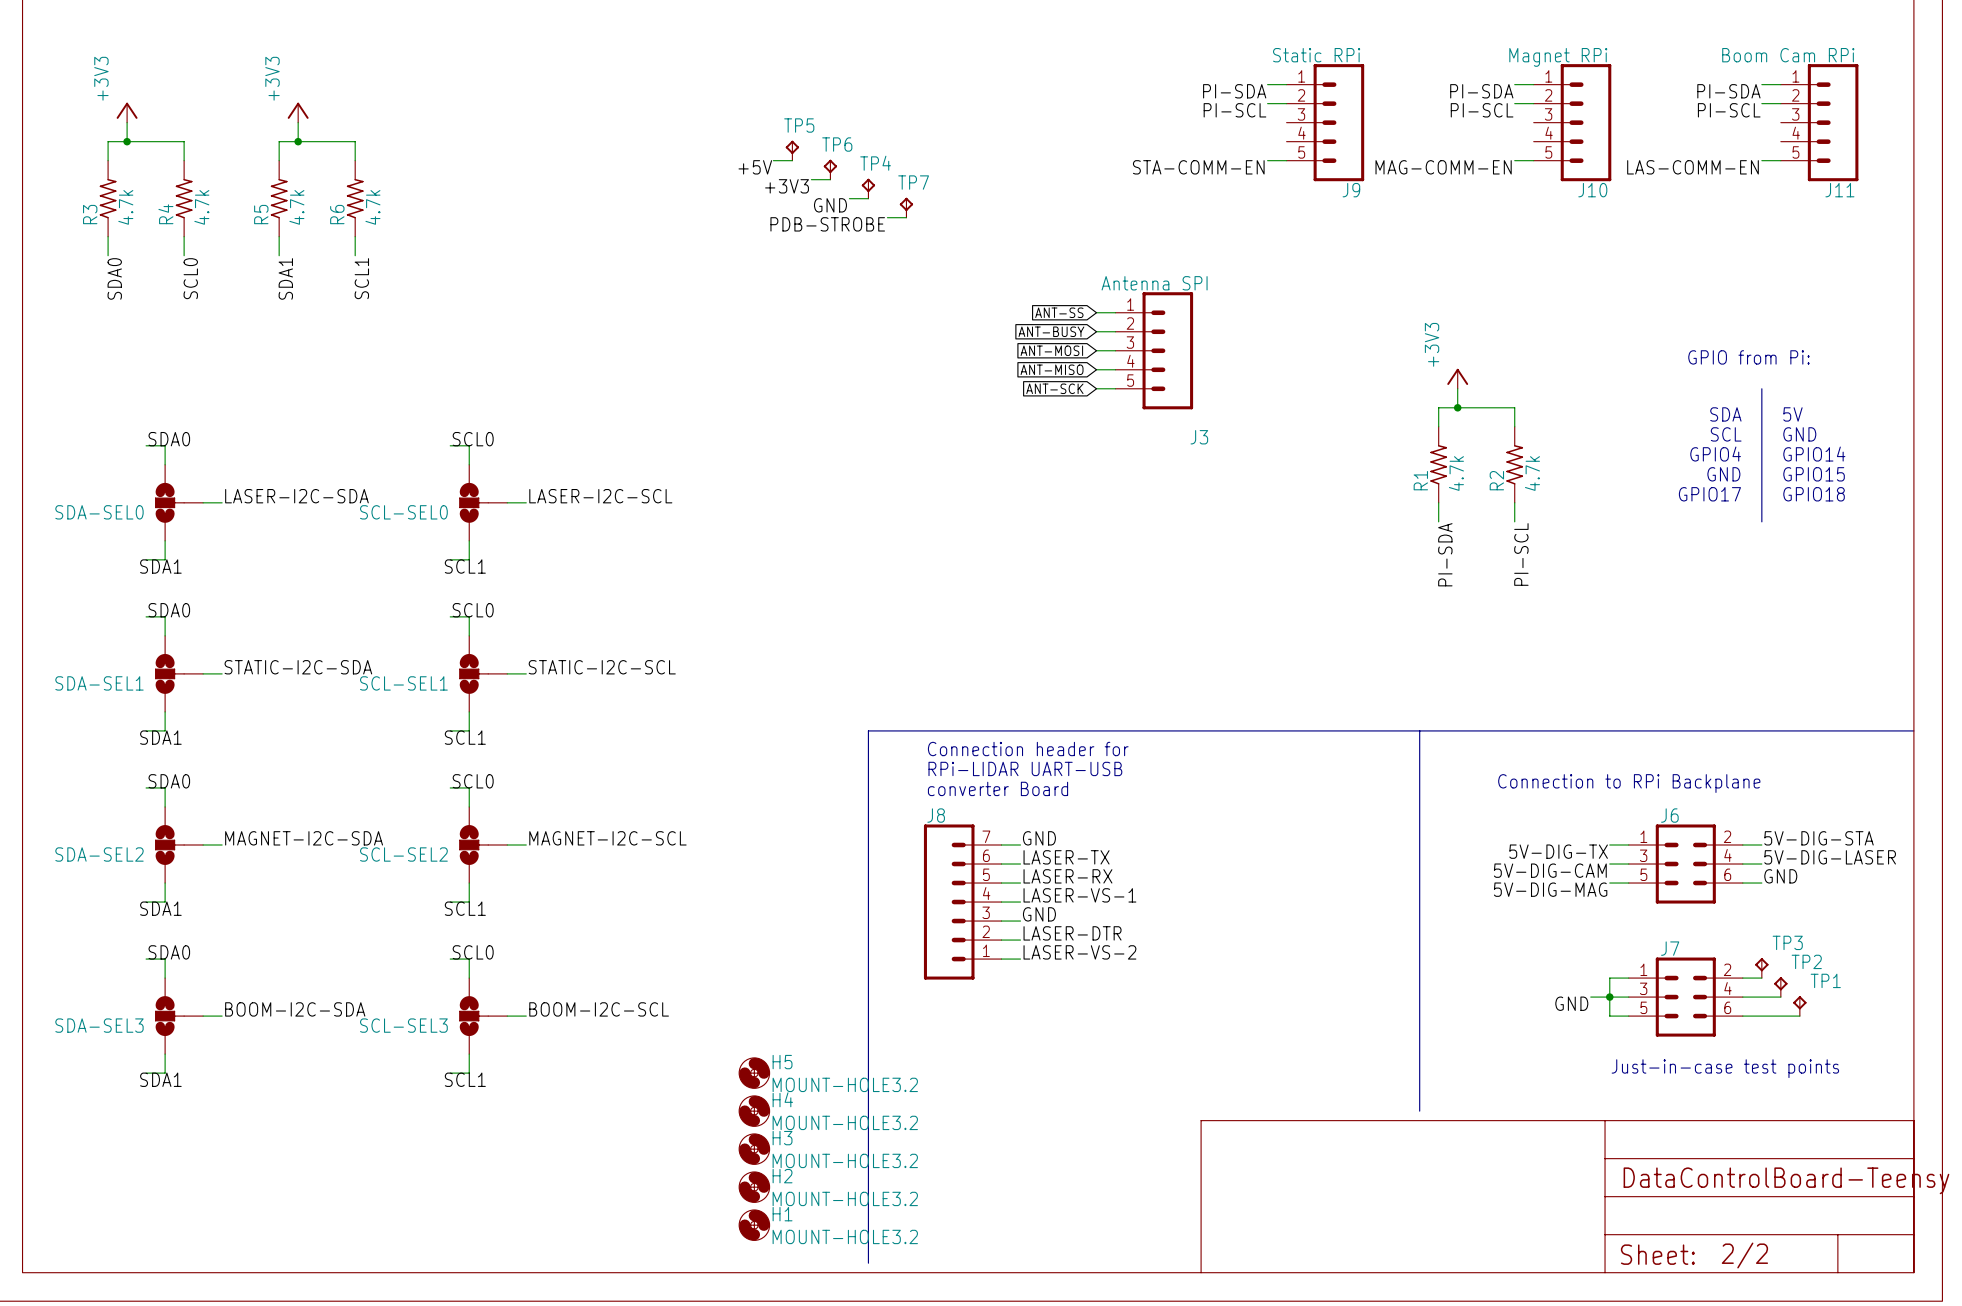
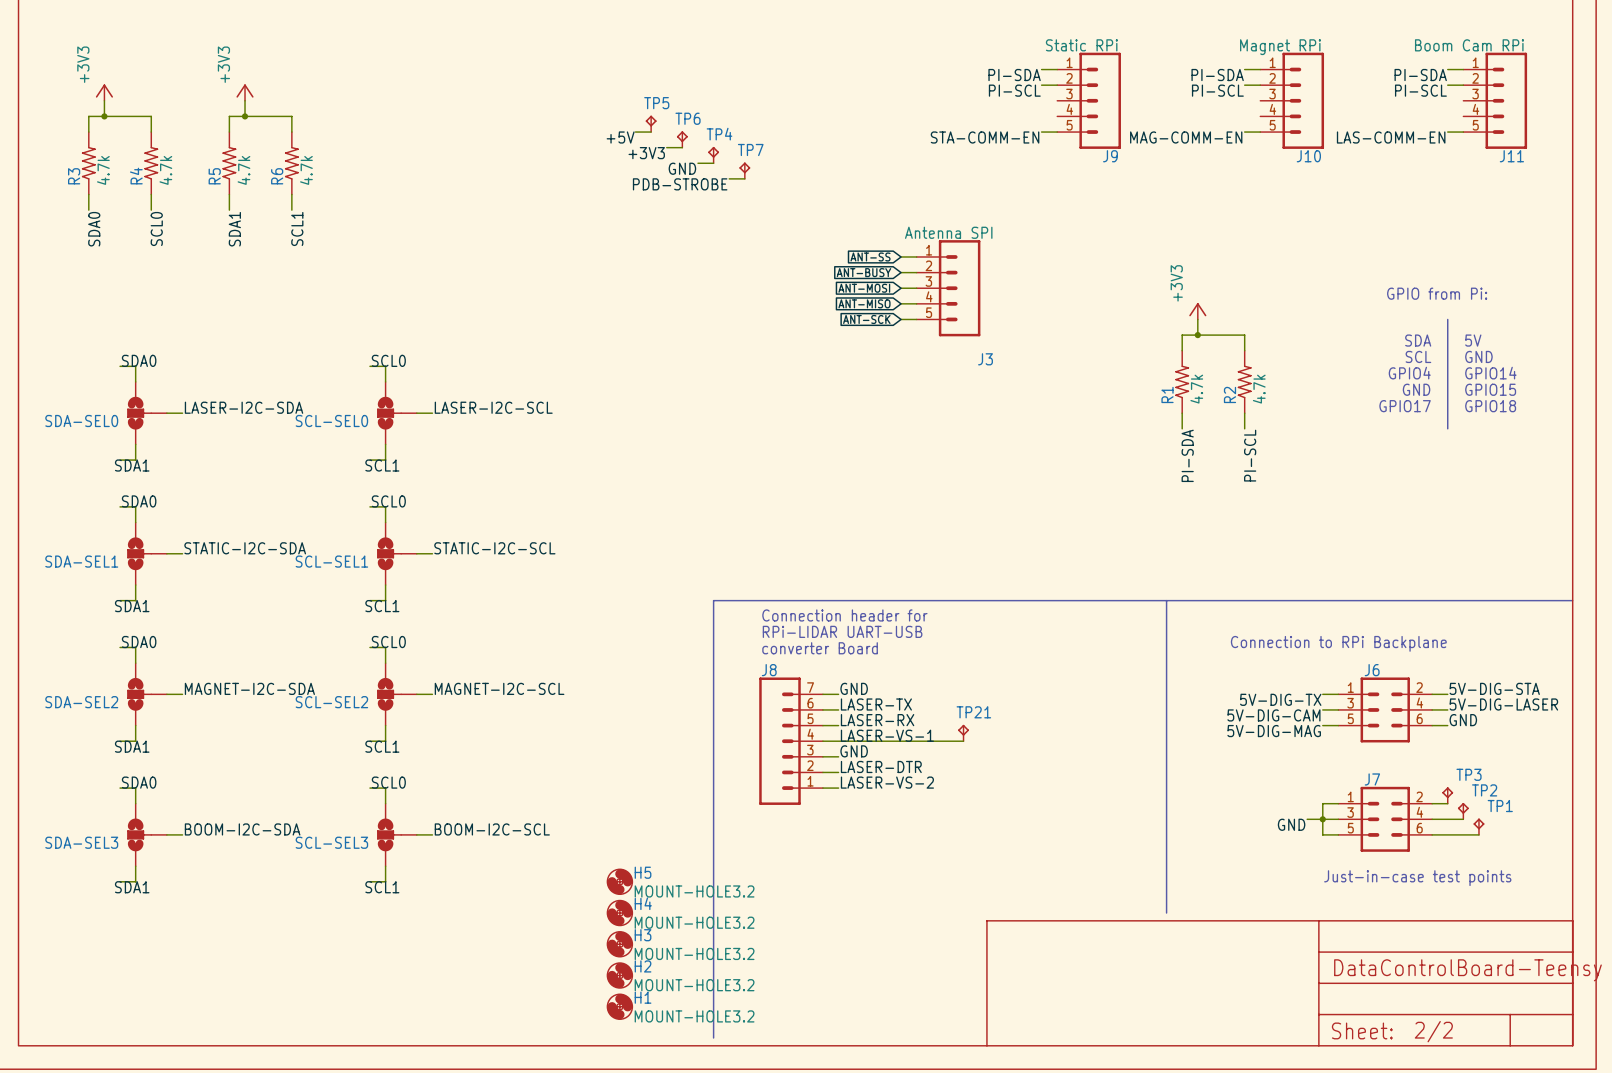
TP21: none -> (963, 733)
wire: none -> (838, 741) (963, 741)

